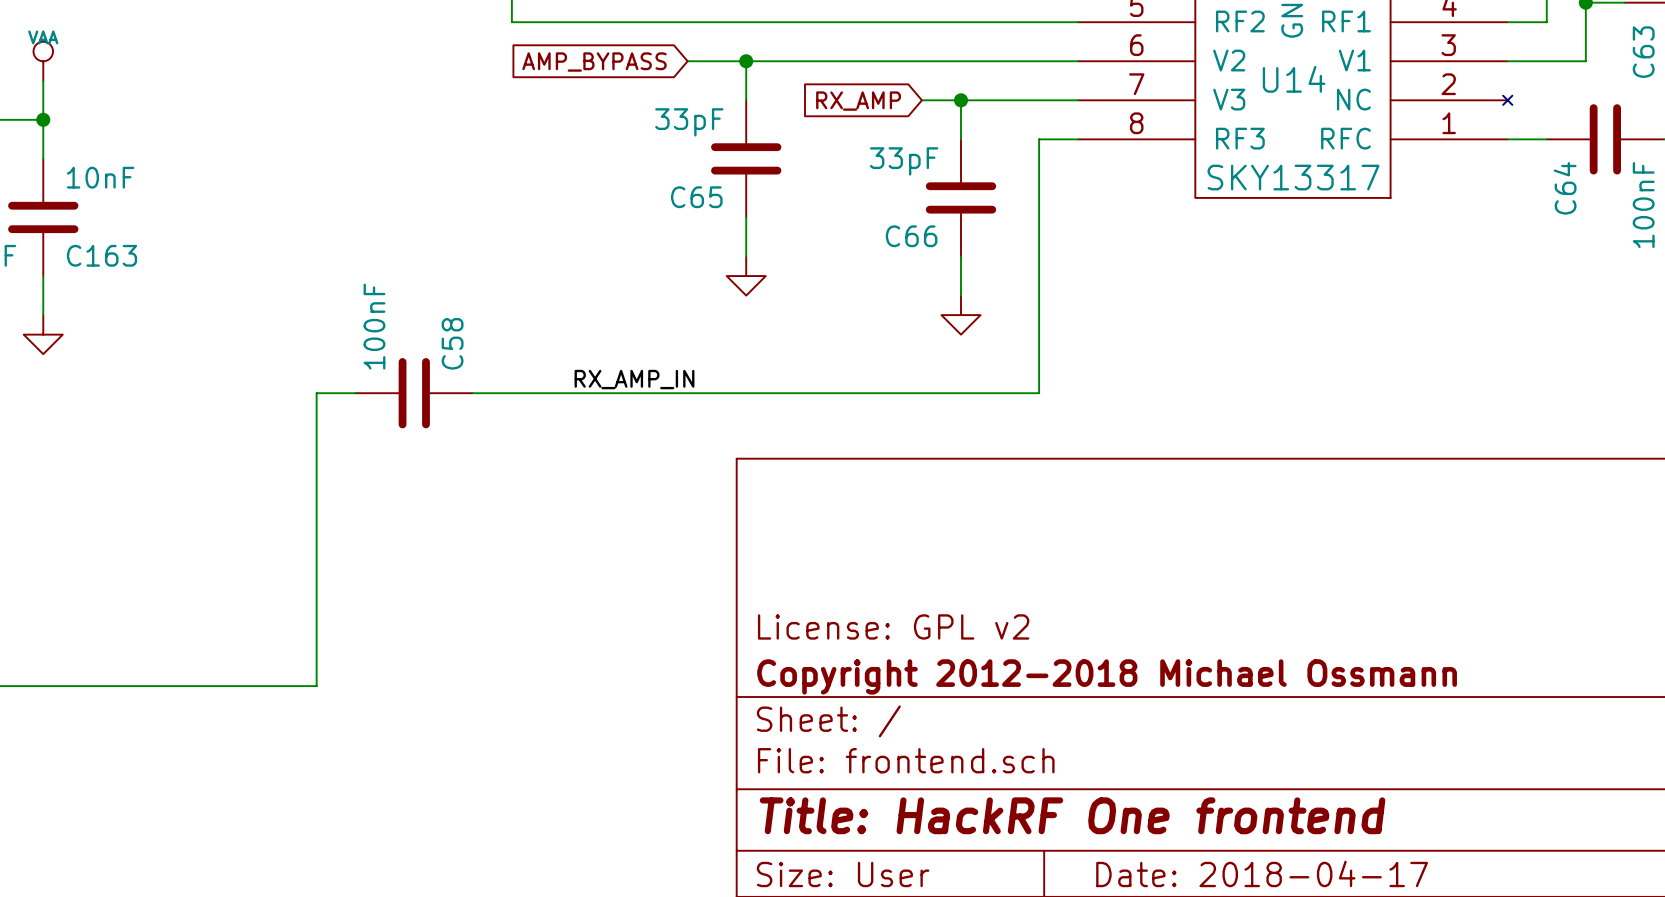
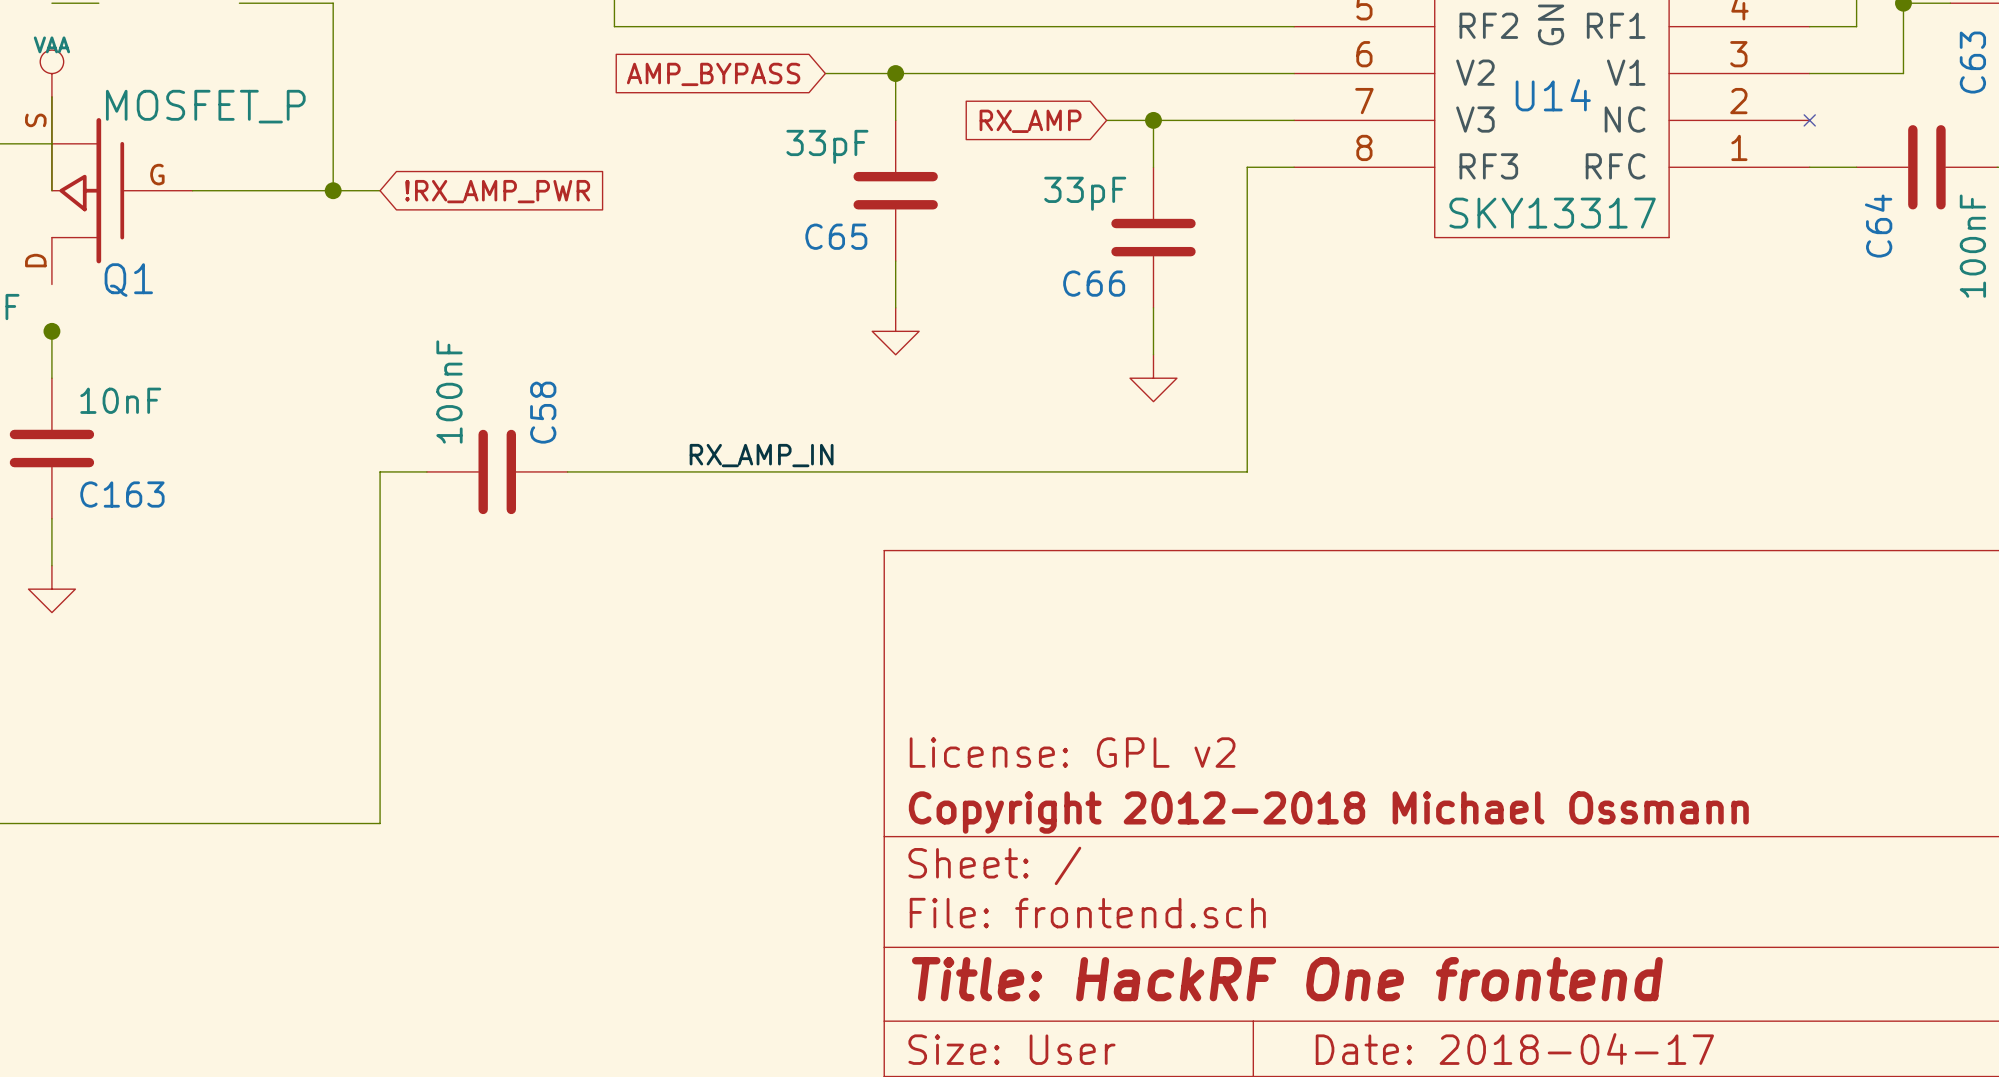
wire: none -> (51, 3) (98, 3)
wire: none -> (239, 3) (333, 3) (333, 190)
junction: (43, 119) -> none
Q1: none -> MOSFET_P (122, 190)
wire: none -> (192, 190) (380, 190)
junction: none -> (333, 190)
global label: none -> !RX_AMP_PWR (497, 191)
C163 position: (43, 217) -> (51, 448)
junction: none -> (51, 331)
power symbol: (43, 334) -> none
wire: none -> (51, 518) (51, 565)
power symbol: none -> (51, 589)

